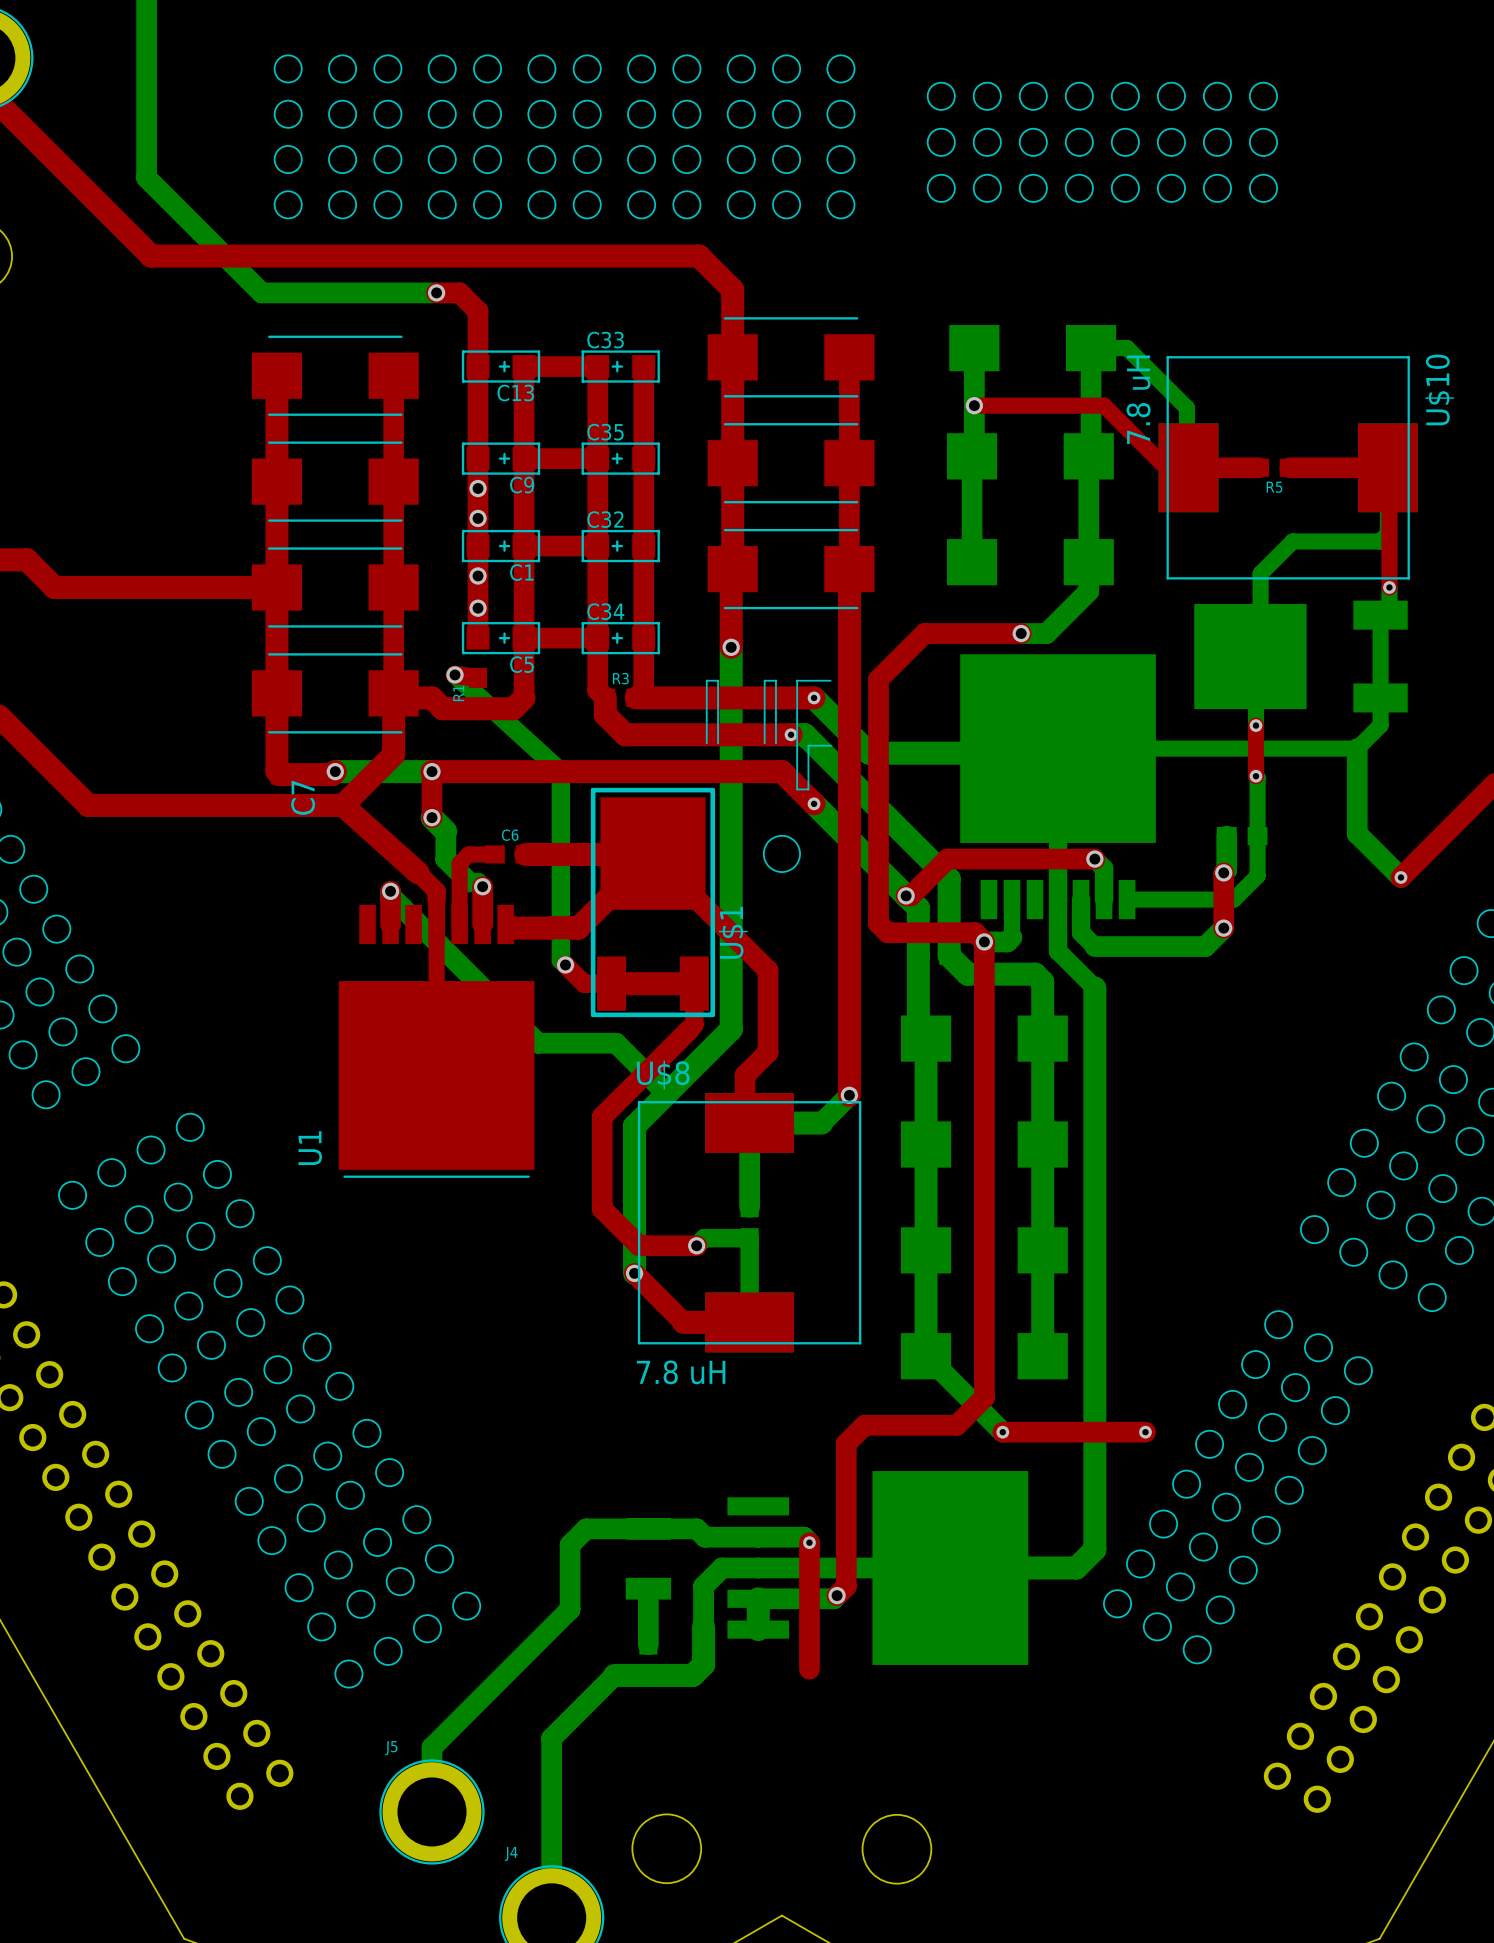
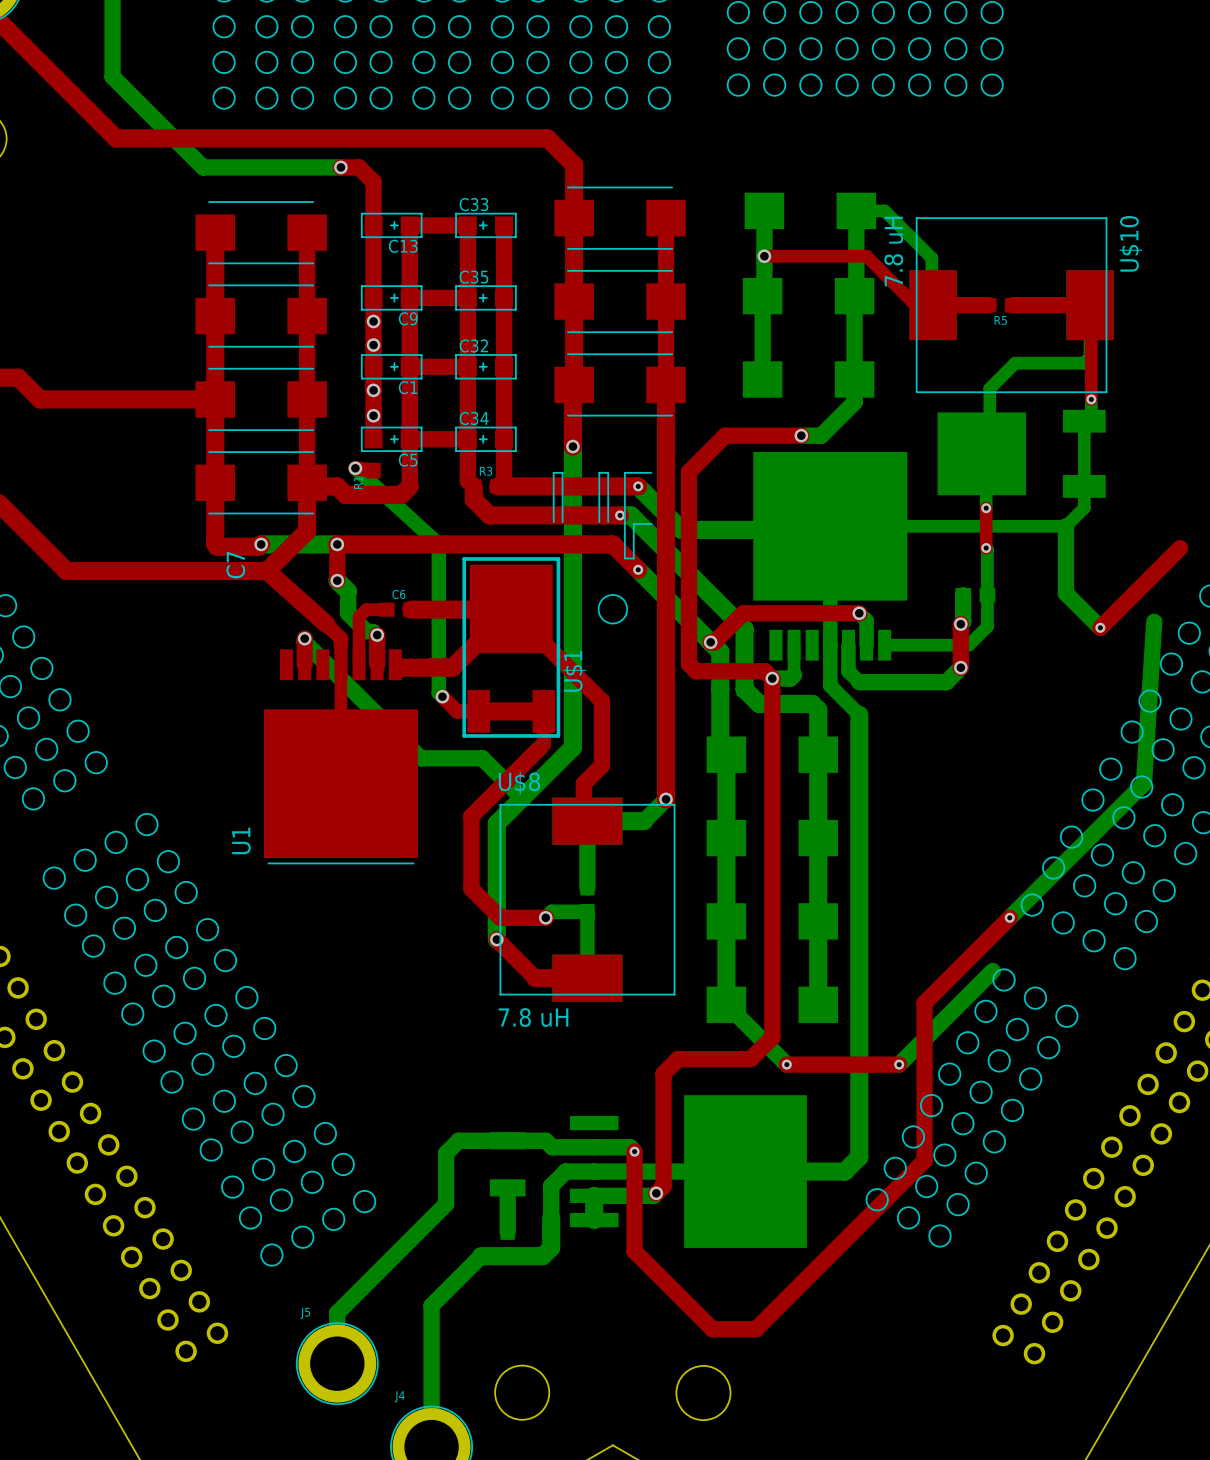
bottom track: none -> (1154, 621) (1143, 783) (1009, 917)
top track: none -> (1009, 917) (924, 1002) (924, 1160) (756, 1329) (712, 1329) (634, 1251)
via: none -> (1009, 917)
bottom track: none -> (992, 971) (899, 1064)

